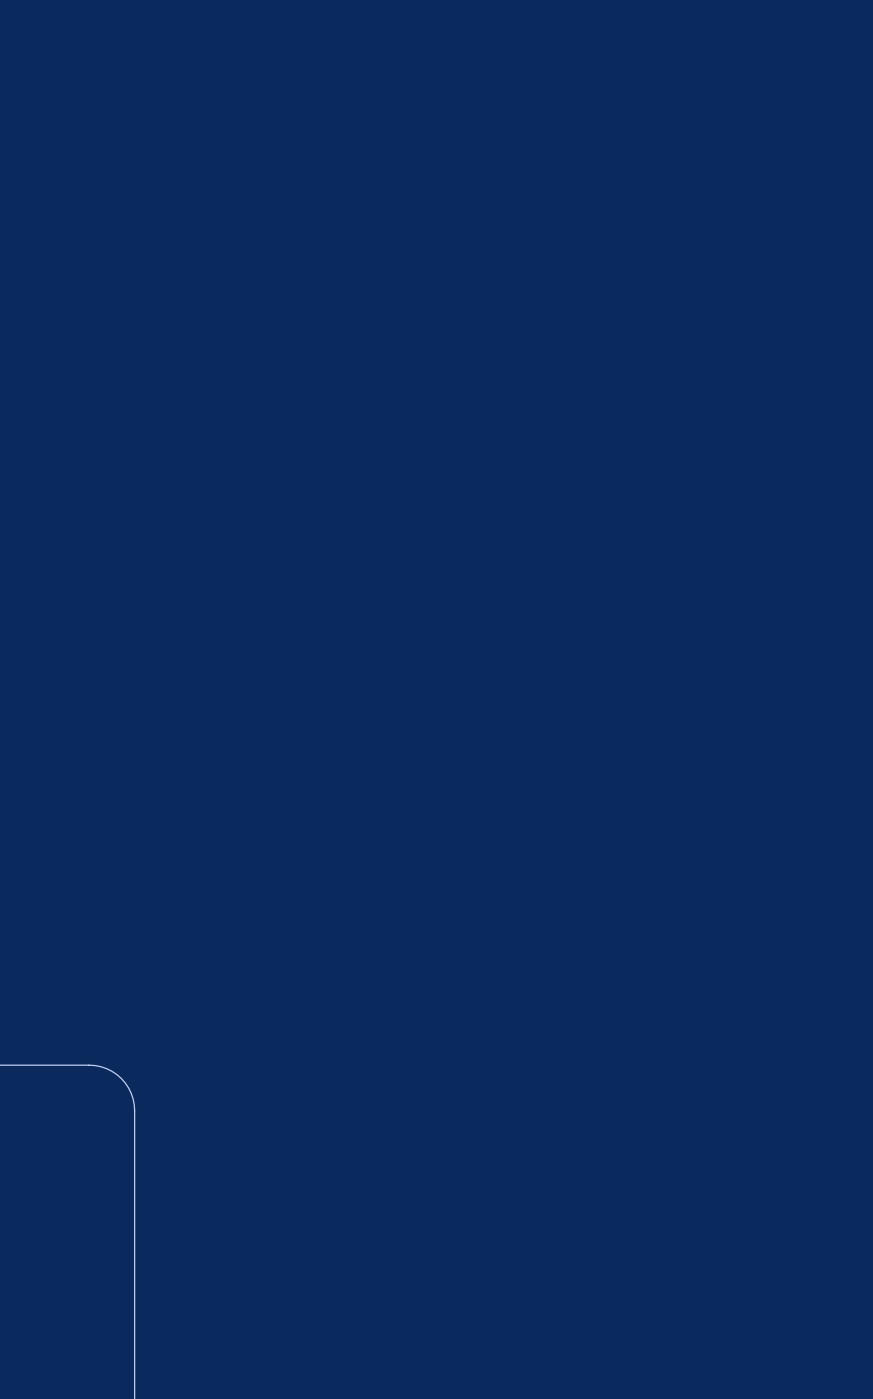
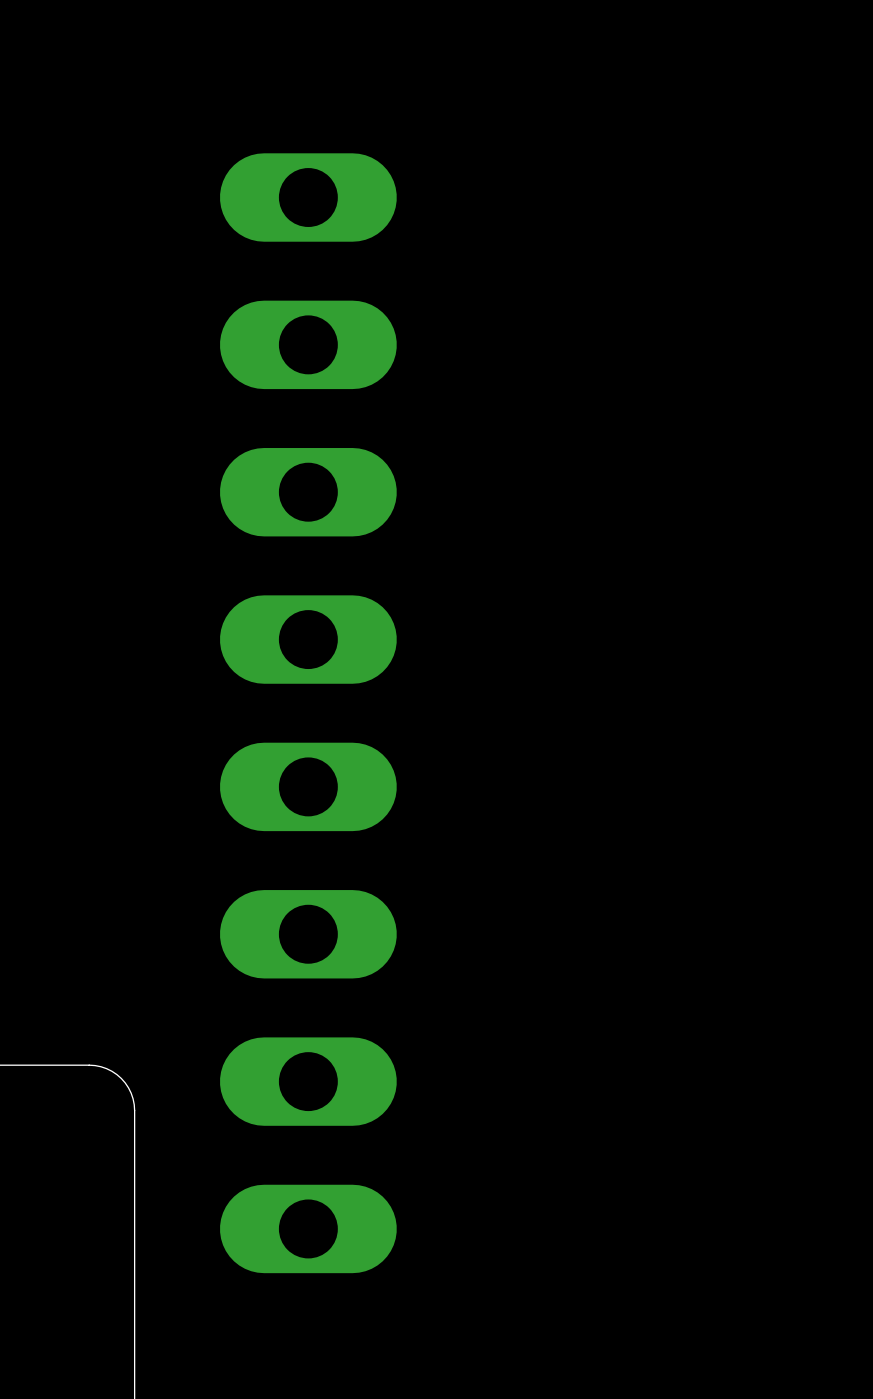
part: none -> (308, 713)

